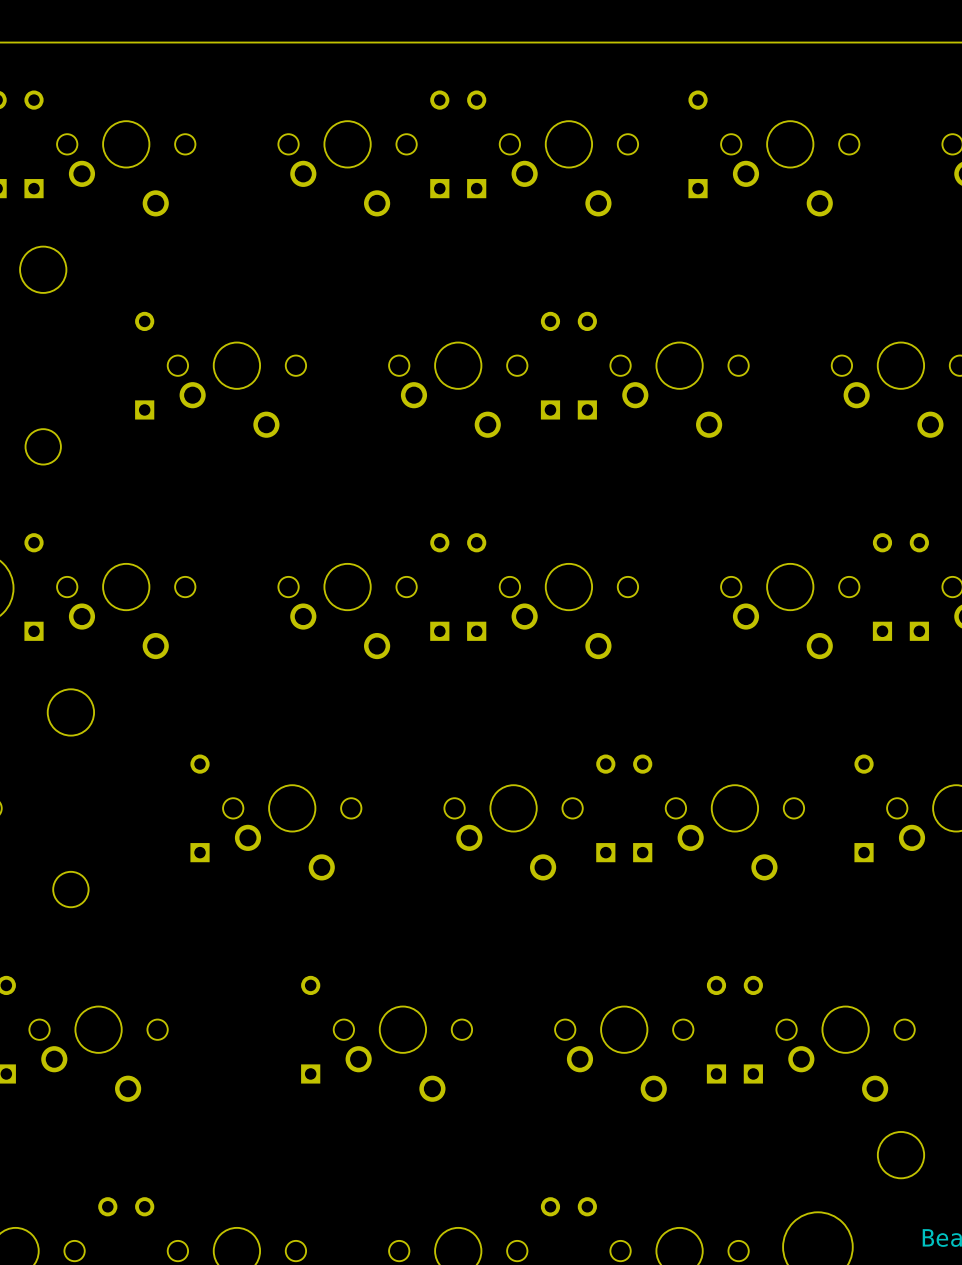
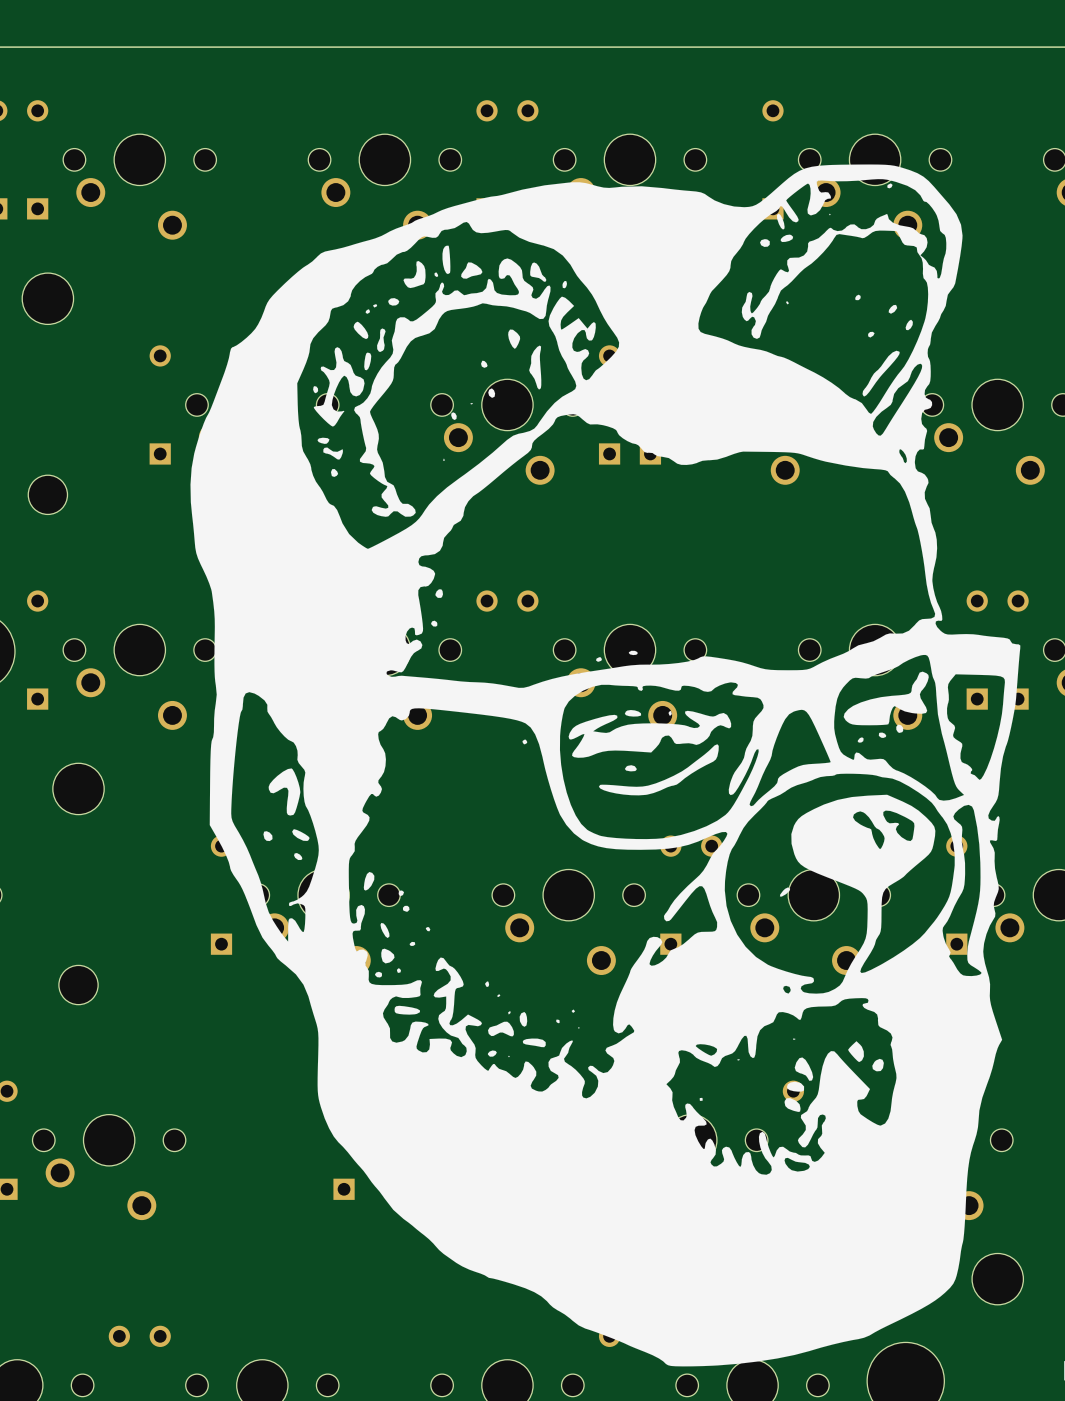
drawing: none -> [190, 164, 1021, 1367]

